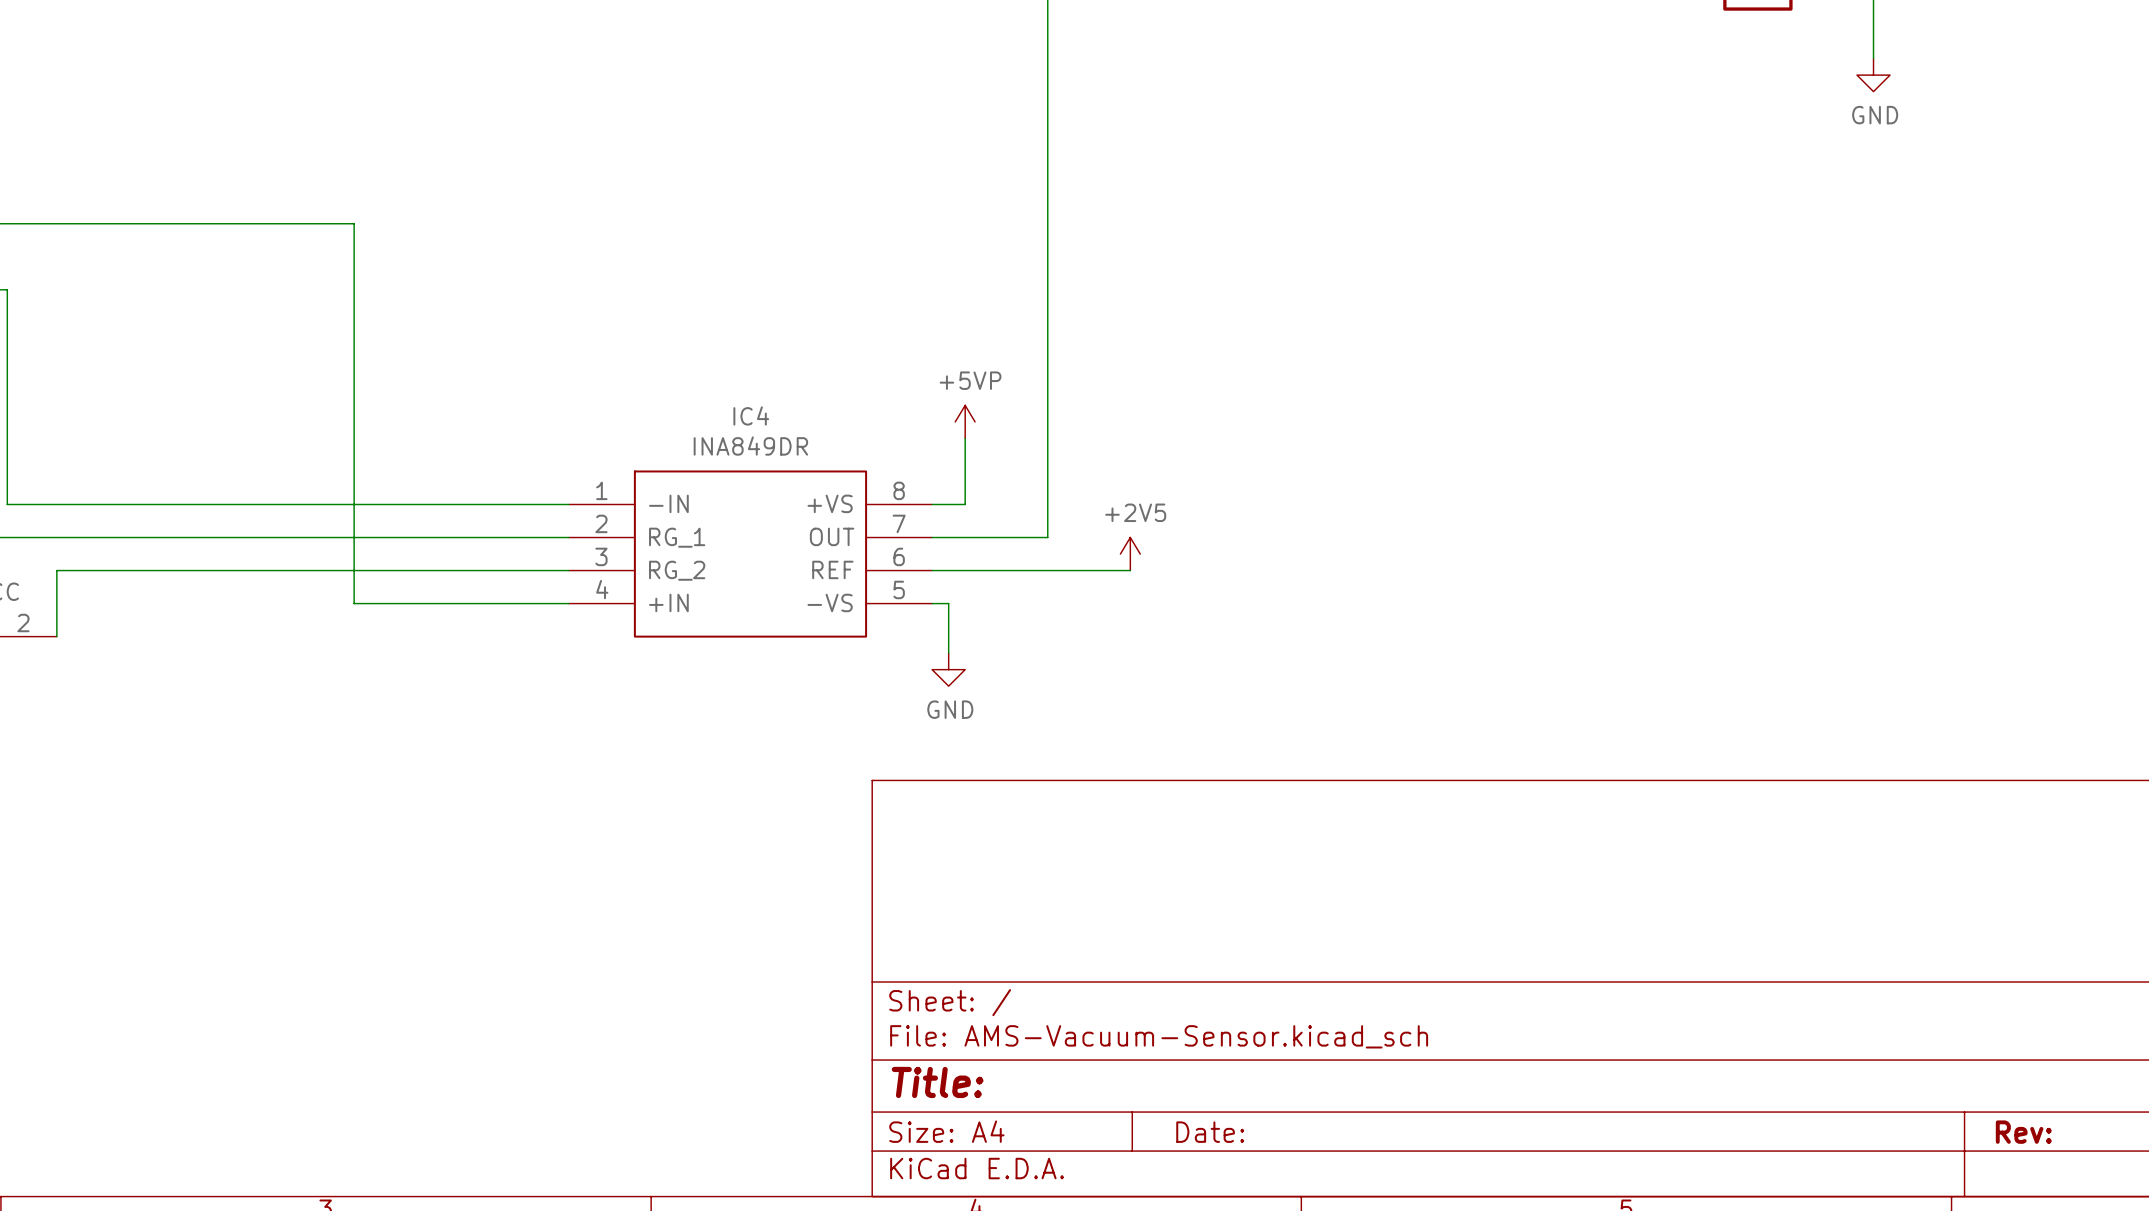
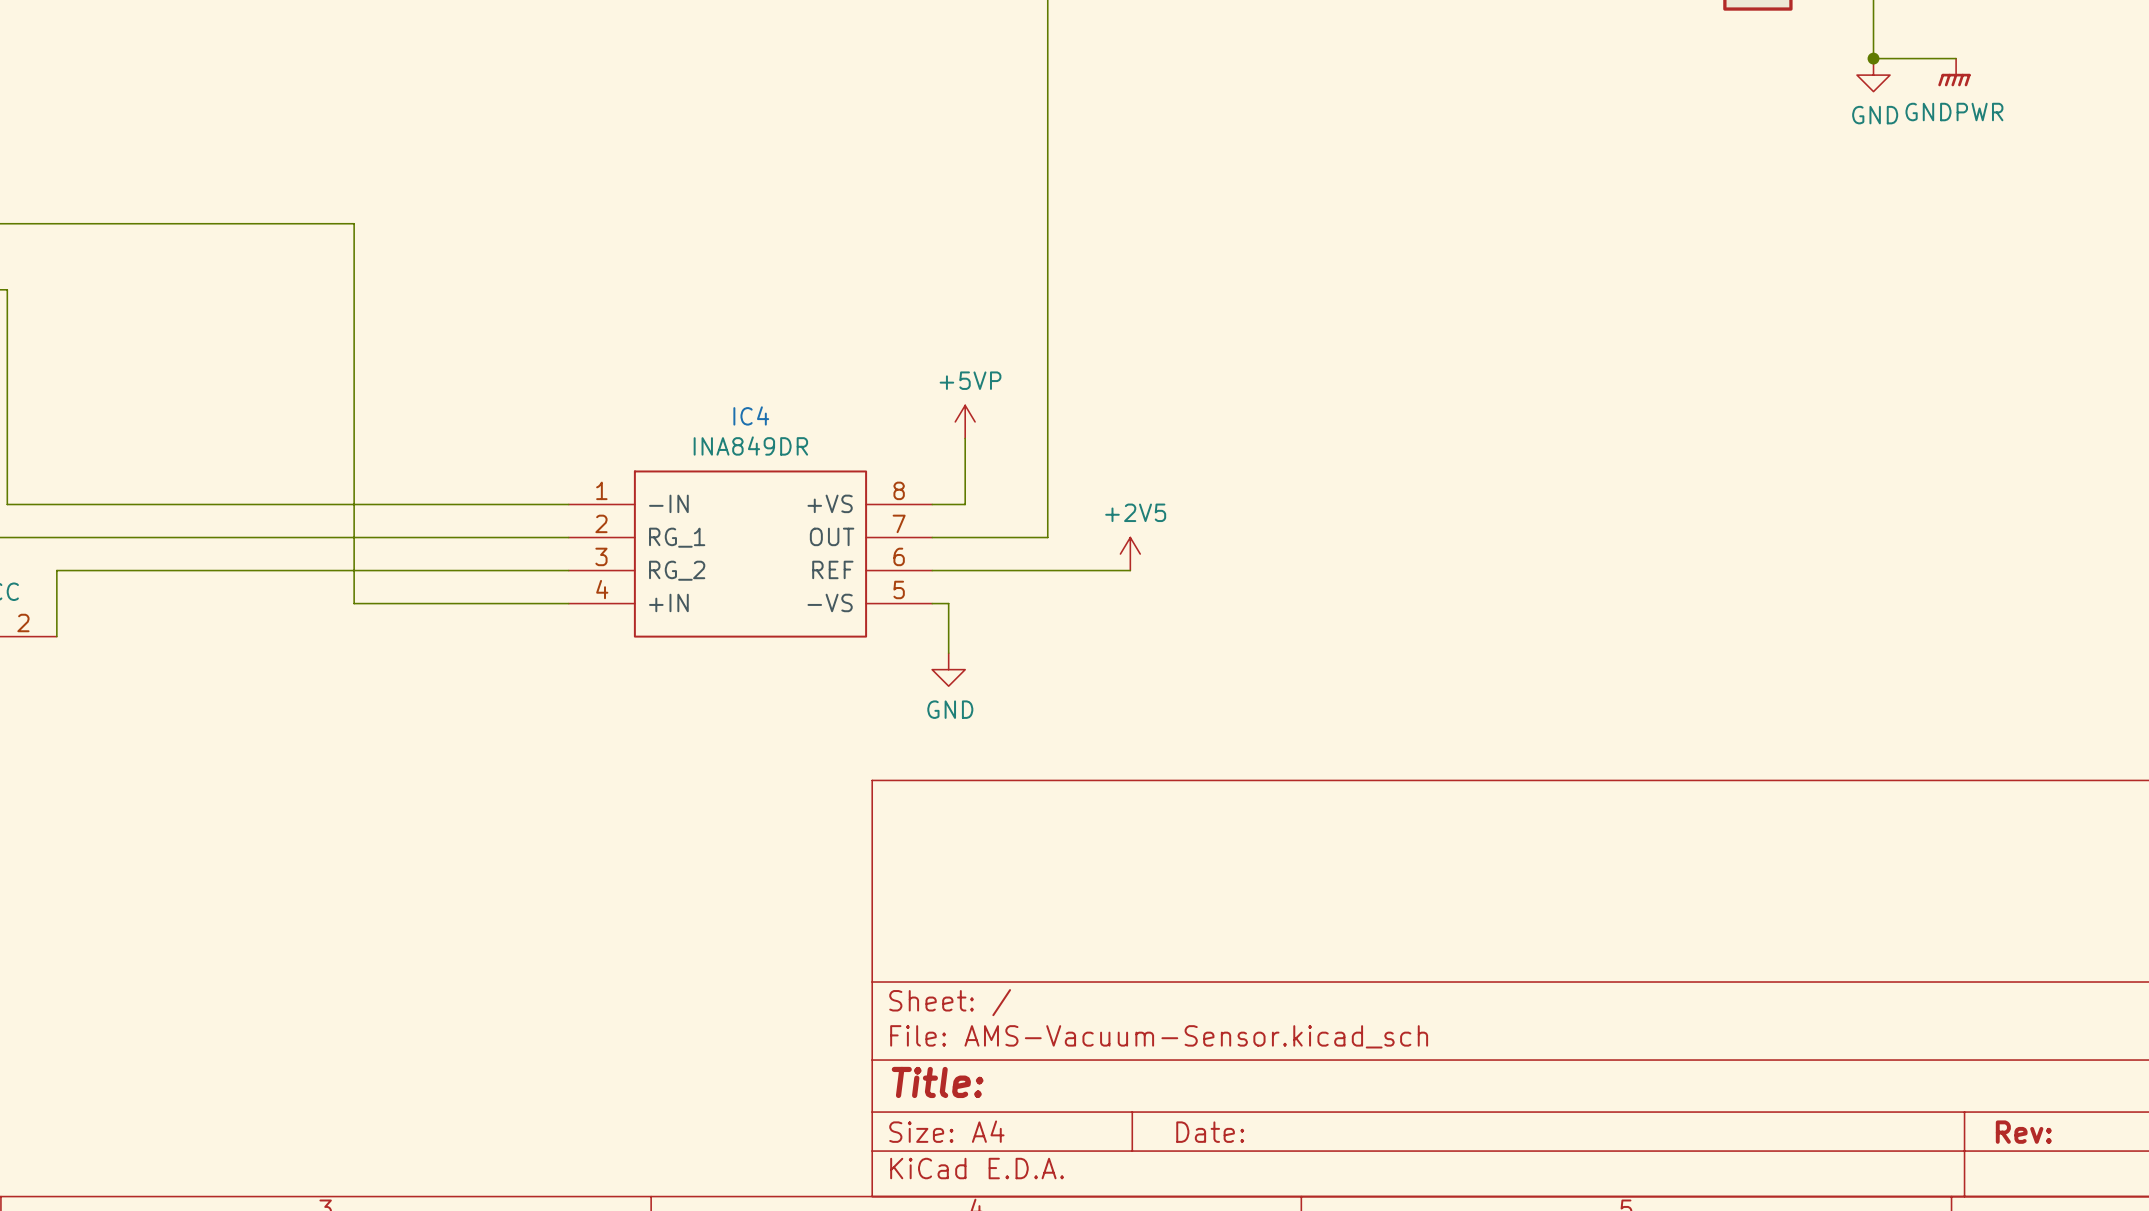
wire: none -> (1873, 58) (1956, 58)
junction: none -> (1873, 58)
power symbol: none -> GNDPWR (1954, 72)

